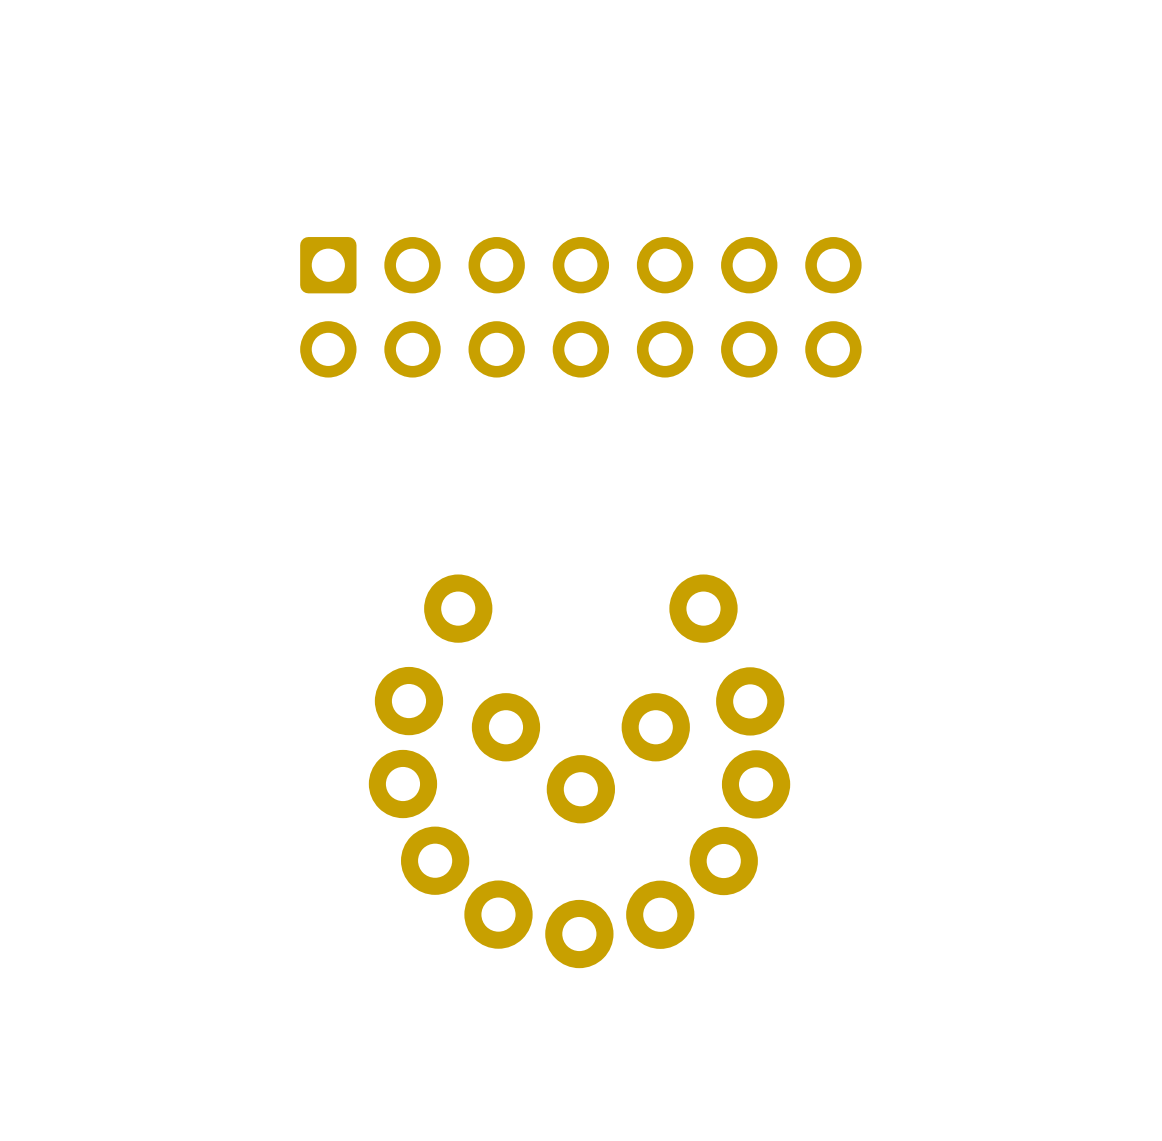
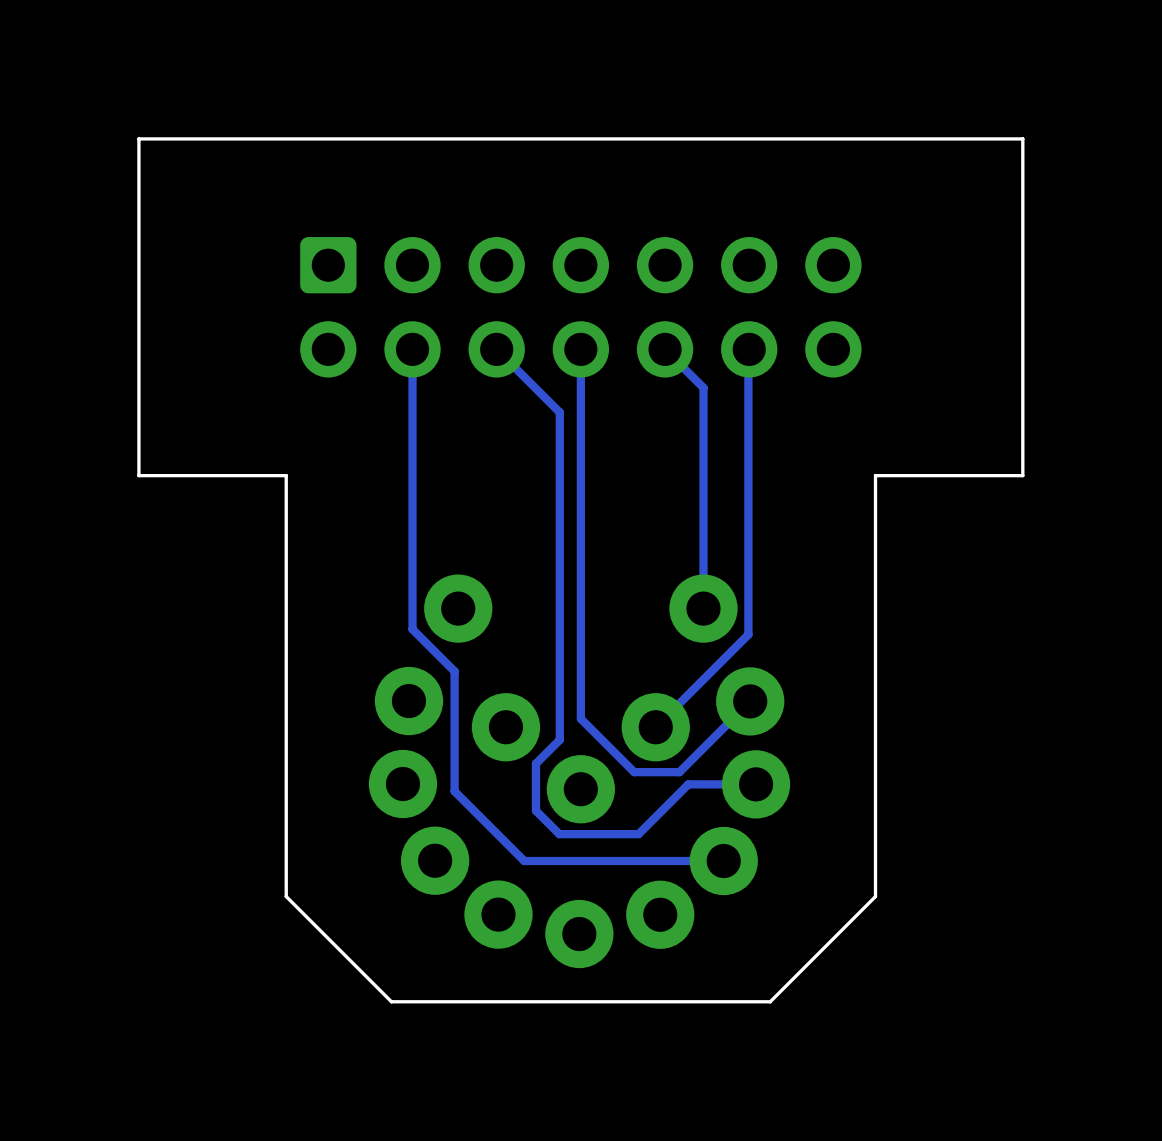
board edge: none -> (1022, 138) (138, 138) (138, 475) (286, 475) (286, 896) (391, 1001) (770, 1001) (875, 896) (875, 475) (1022, 475) (1022, 138)
track: none -> (412, 349) (412, 629) (454, 671) (454, 791) (524, 861) (723, 861)
track: none -> (496, 349) (559, 412) (559, 739) (535, 763) (535, 810) (559, 834) (638, 834) (688, 784) (756, 784)
track: none -> (580, 349) (580, 718) (634, 772) (679, 772) (750, 701)
track: none -> (665, 349) (703, 387) (703, 608)
track: none -> (749, 349) (748, 634) (655, 727)

